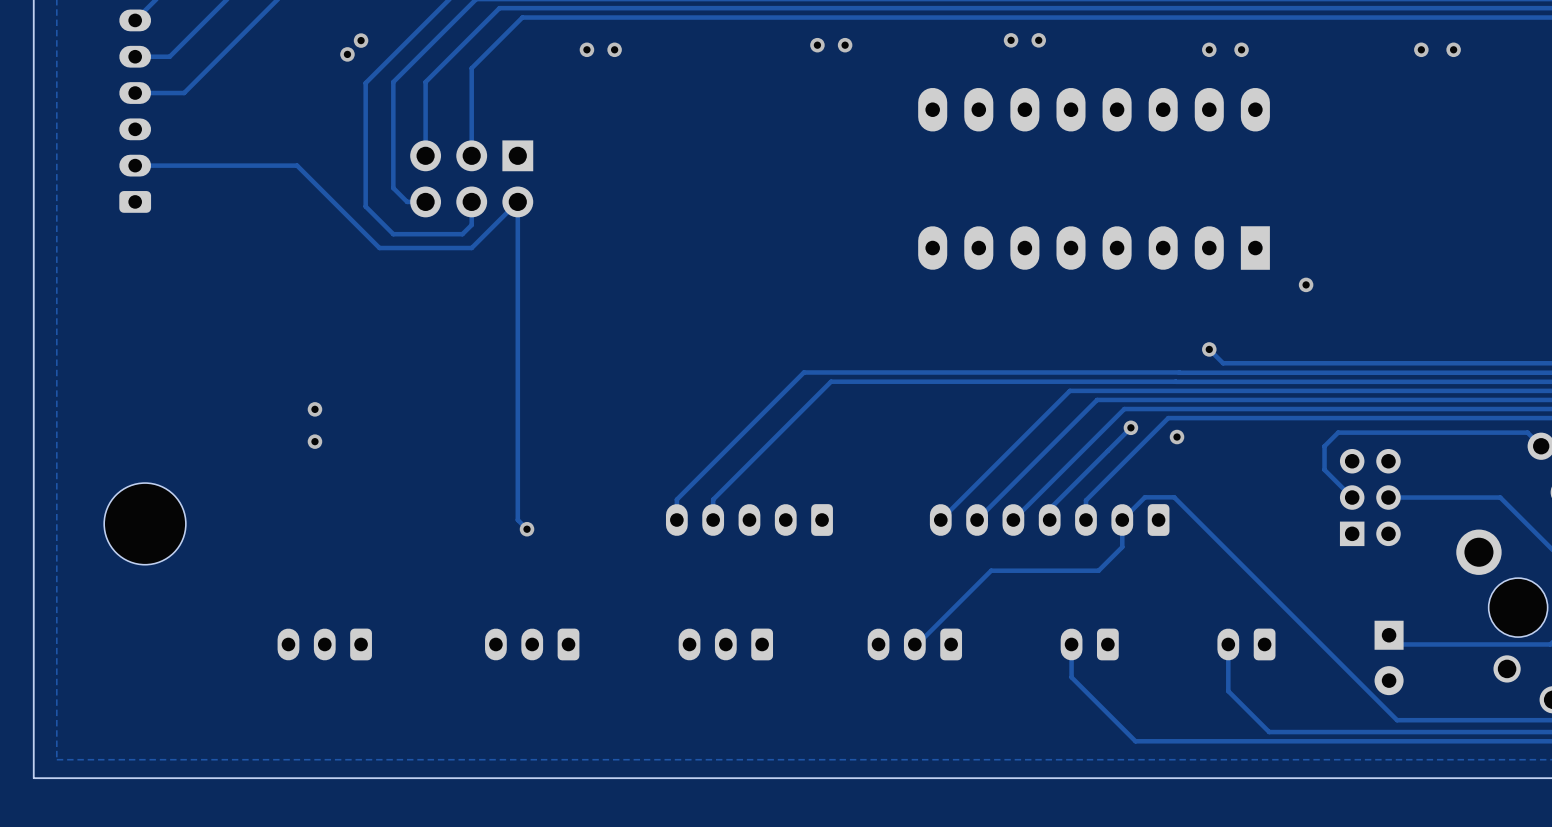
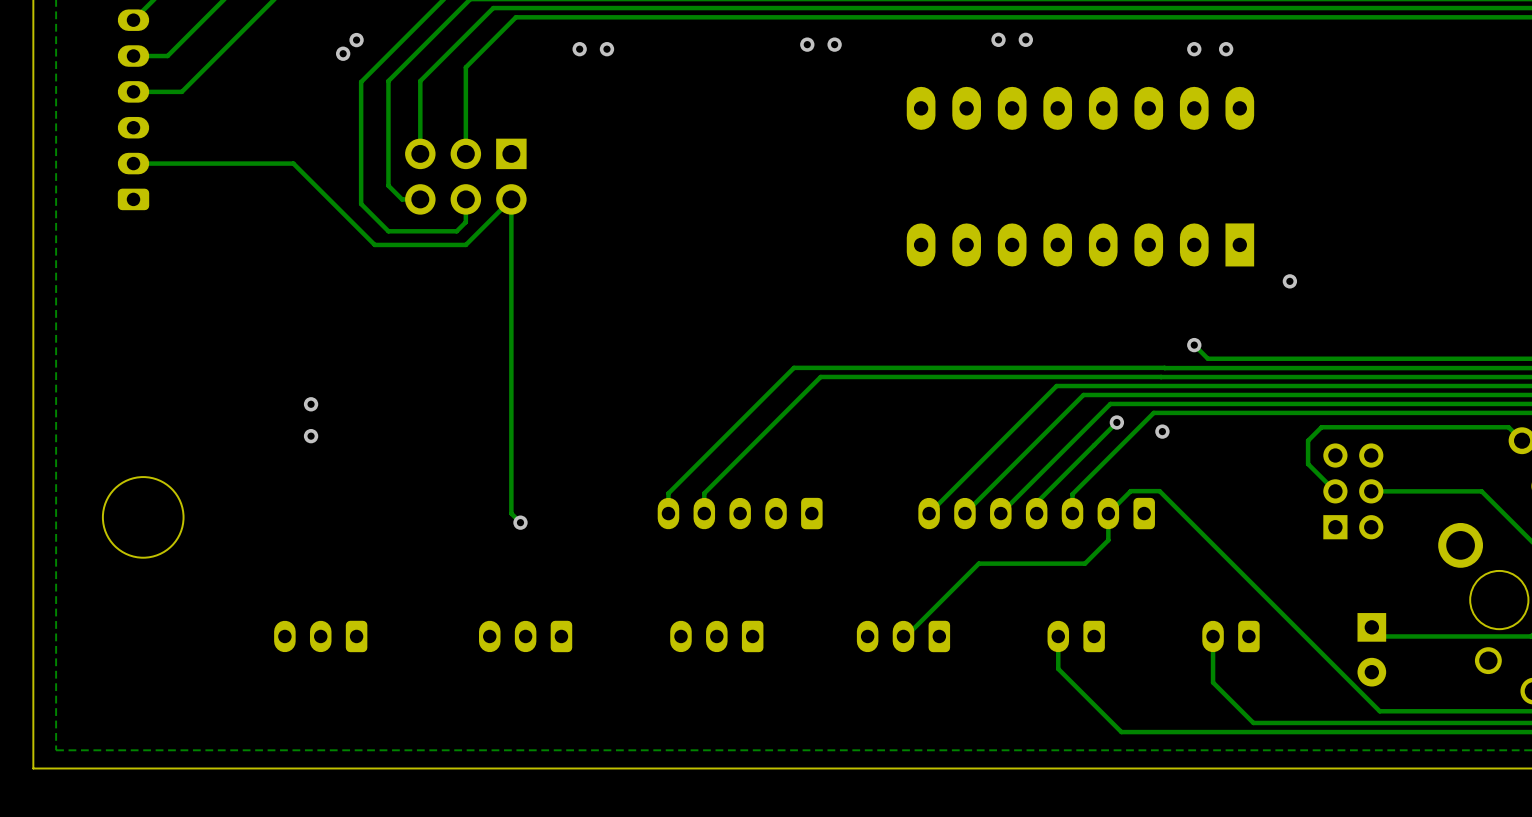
via: (1421, 49) -> none
via: (1453, 49) -> none

